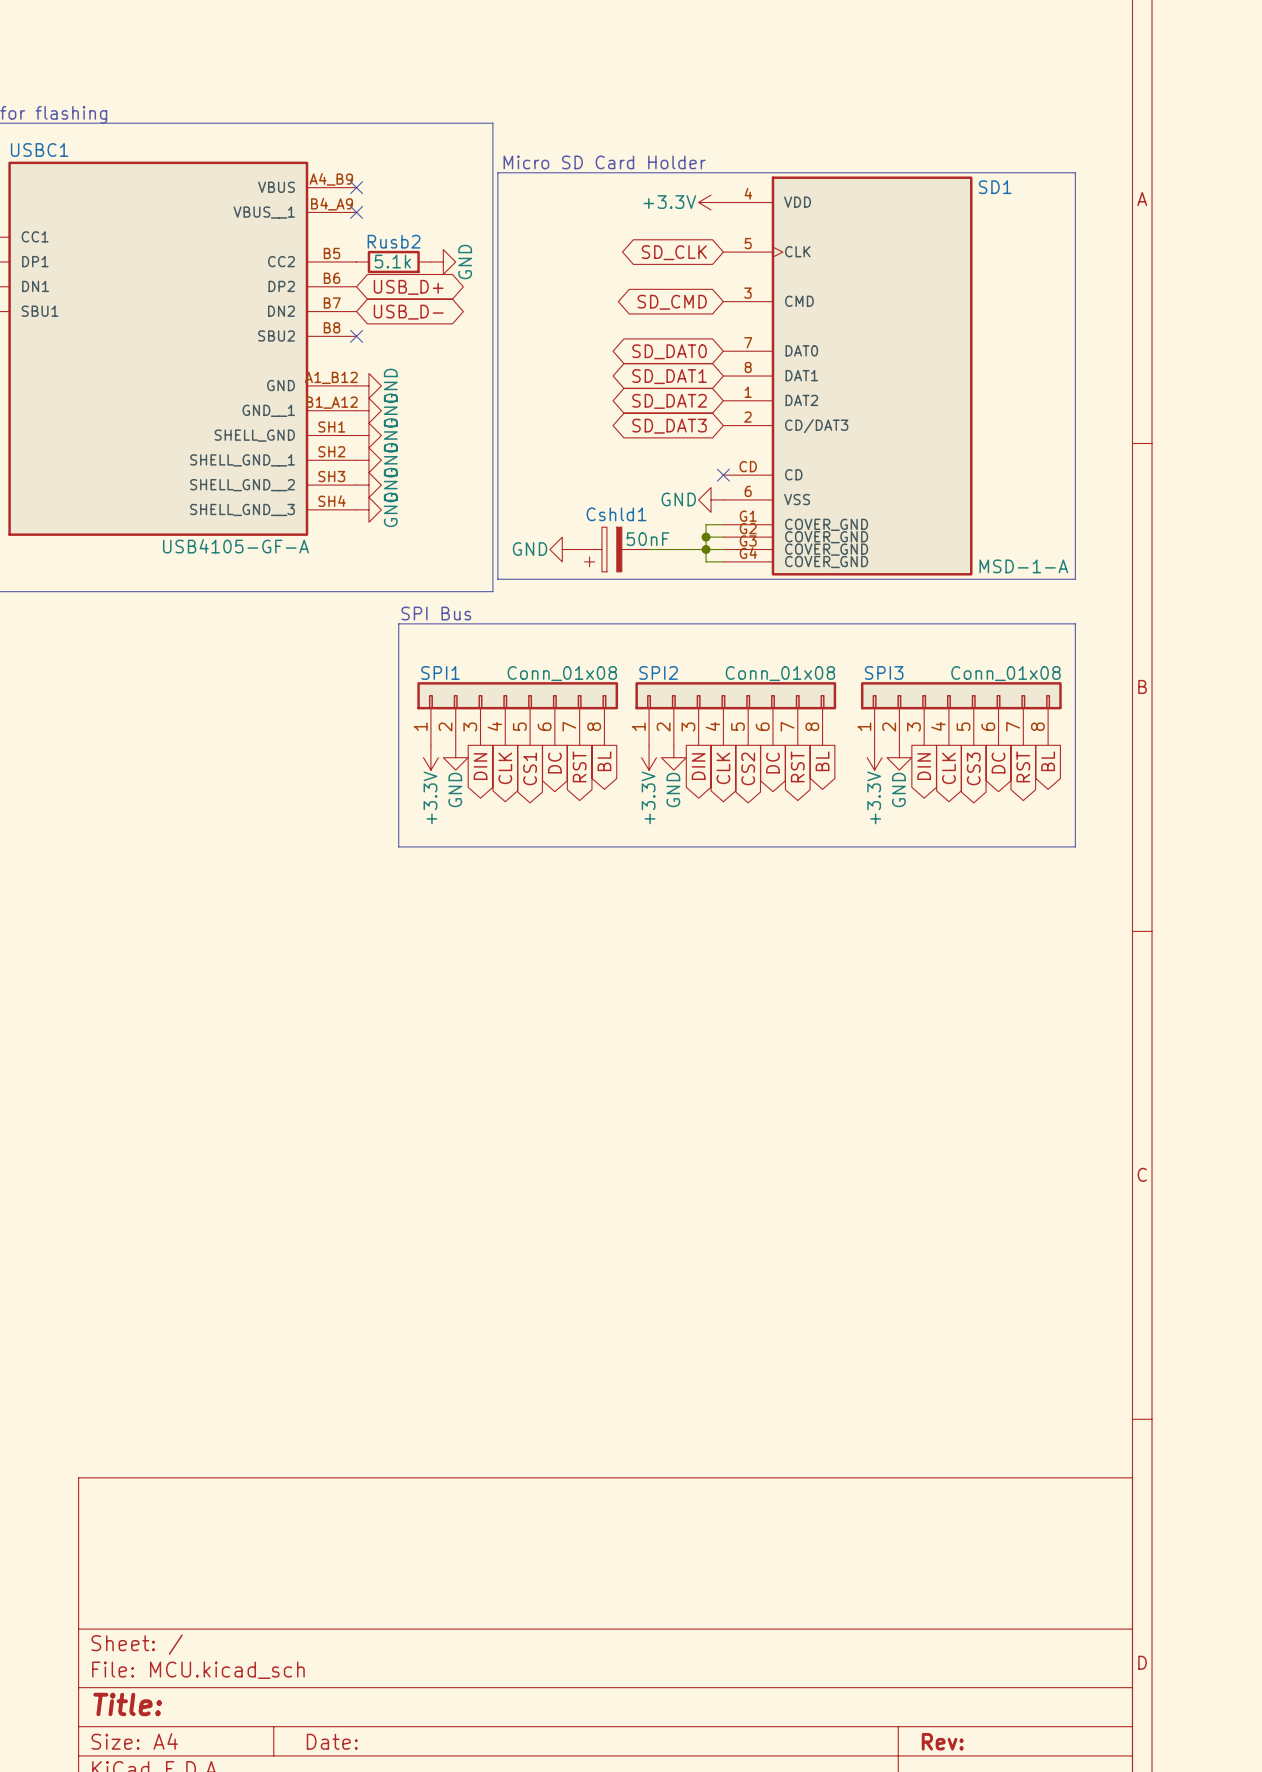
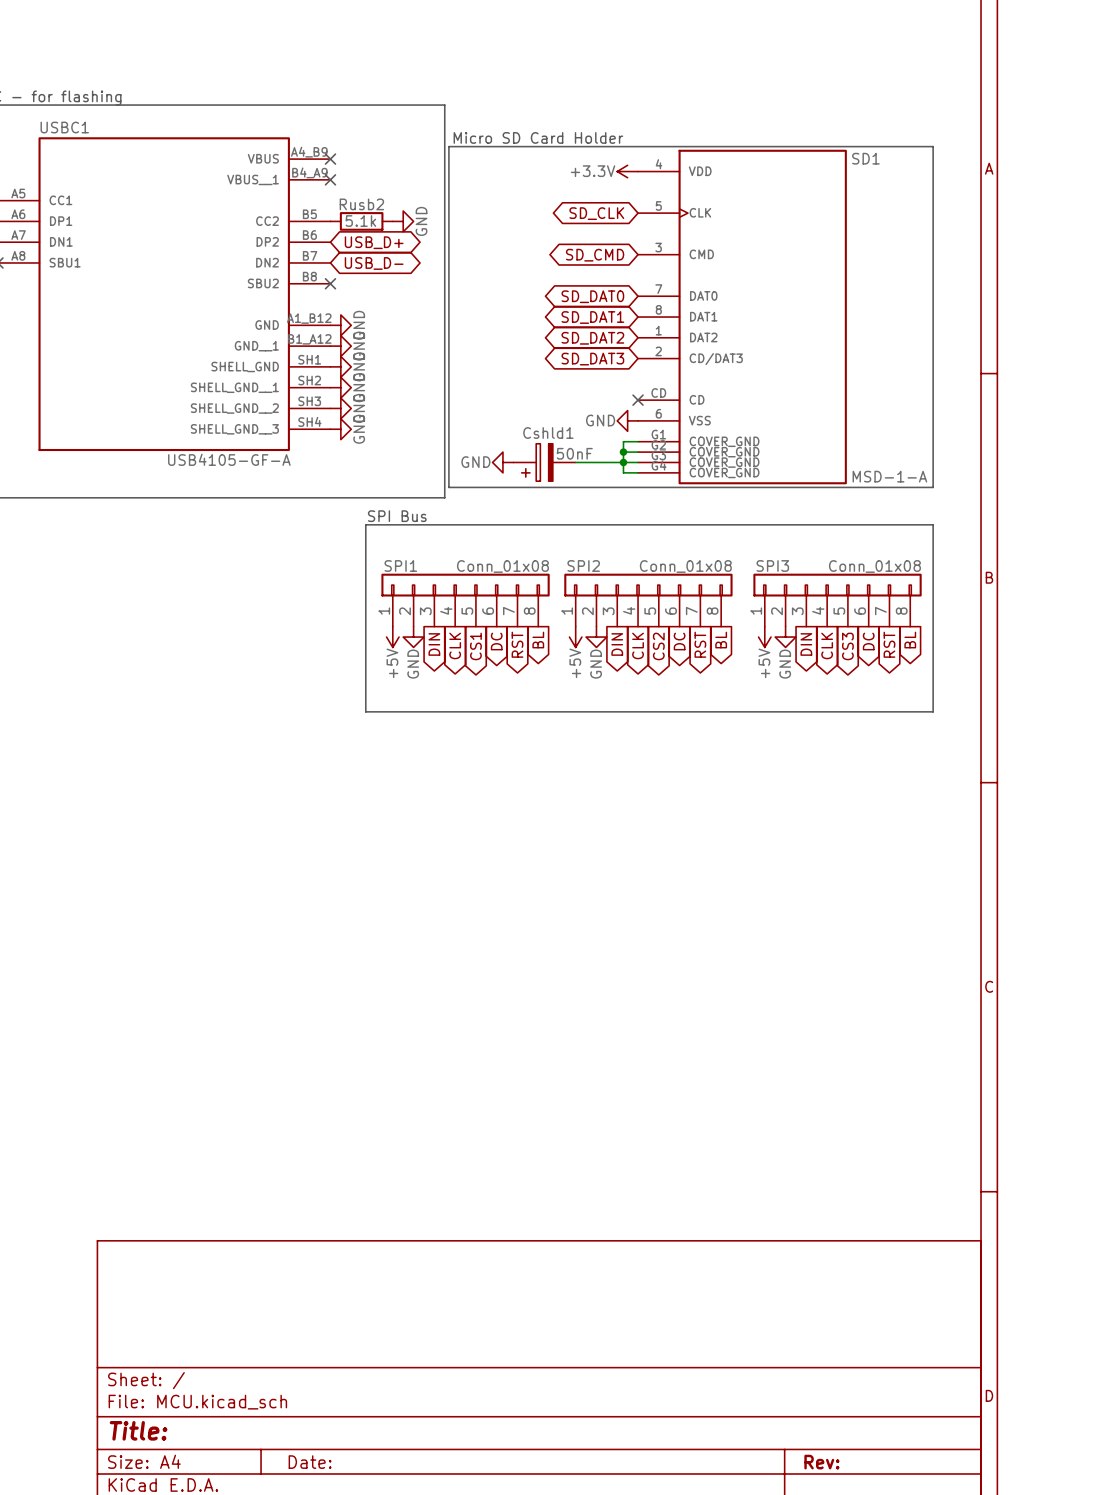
power symbol: +3.3V (430, 757) -> +5V (392, 637)
power symbol: +3.3V (649, 757) -> +5V (575, 637)
power symbol: +3.3V (874, 757) -> +5V (764, 637)

